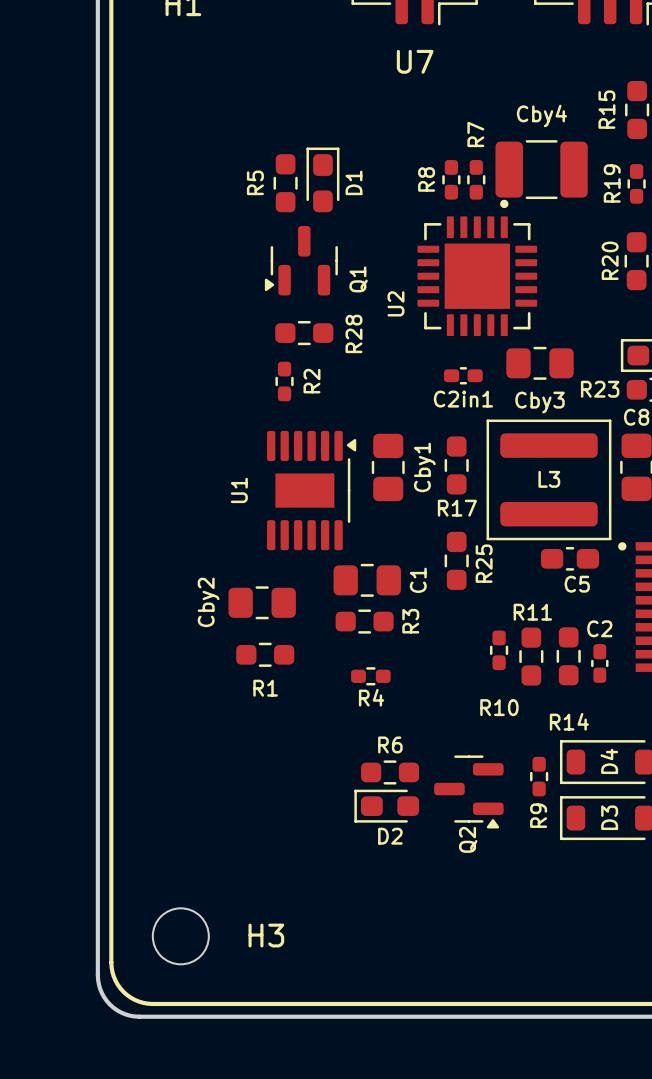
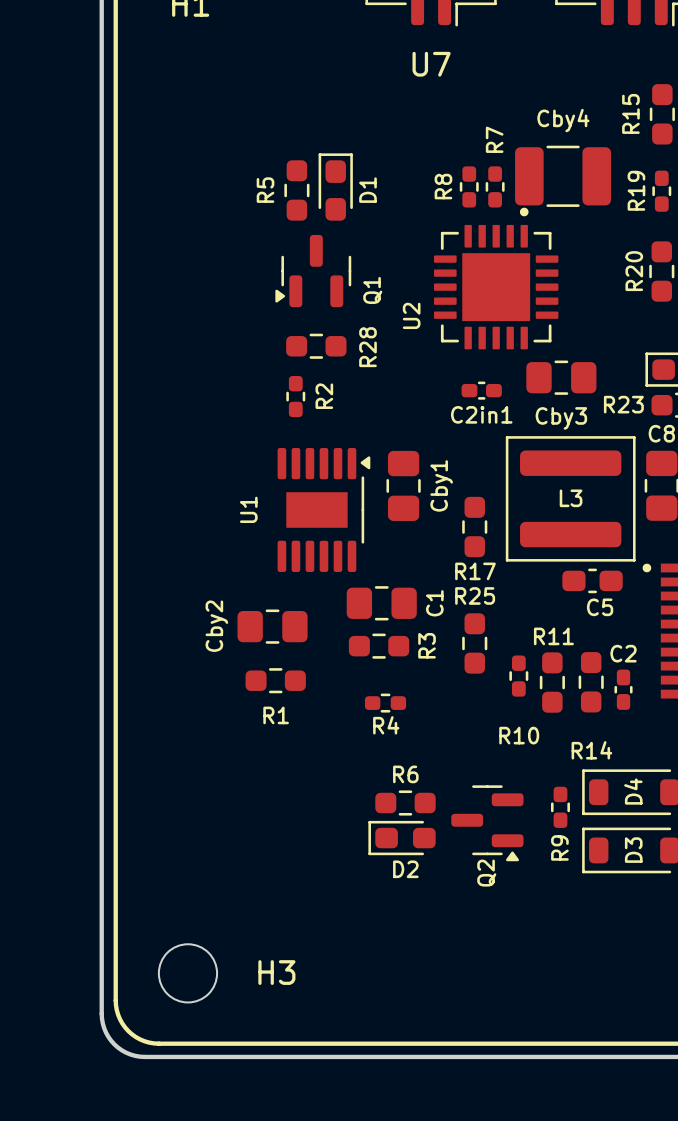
R17 position: (456, 465) -> (474, 527)
R25 position: (456, 560) -> (474, 643)
R25 name rotation: 0° (484, 563) -> 90° clockwise (475, 595)

